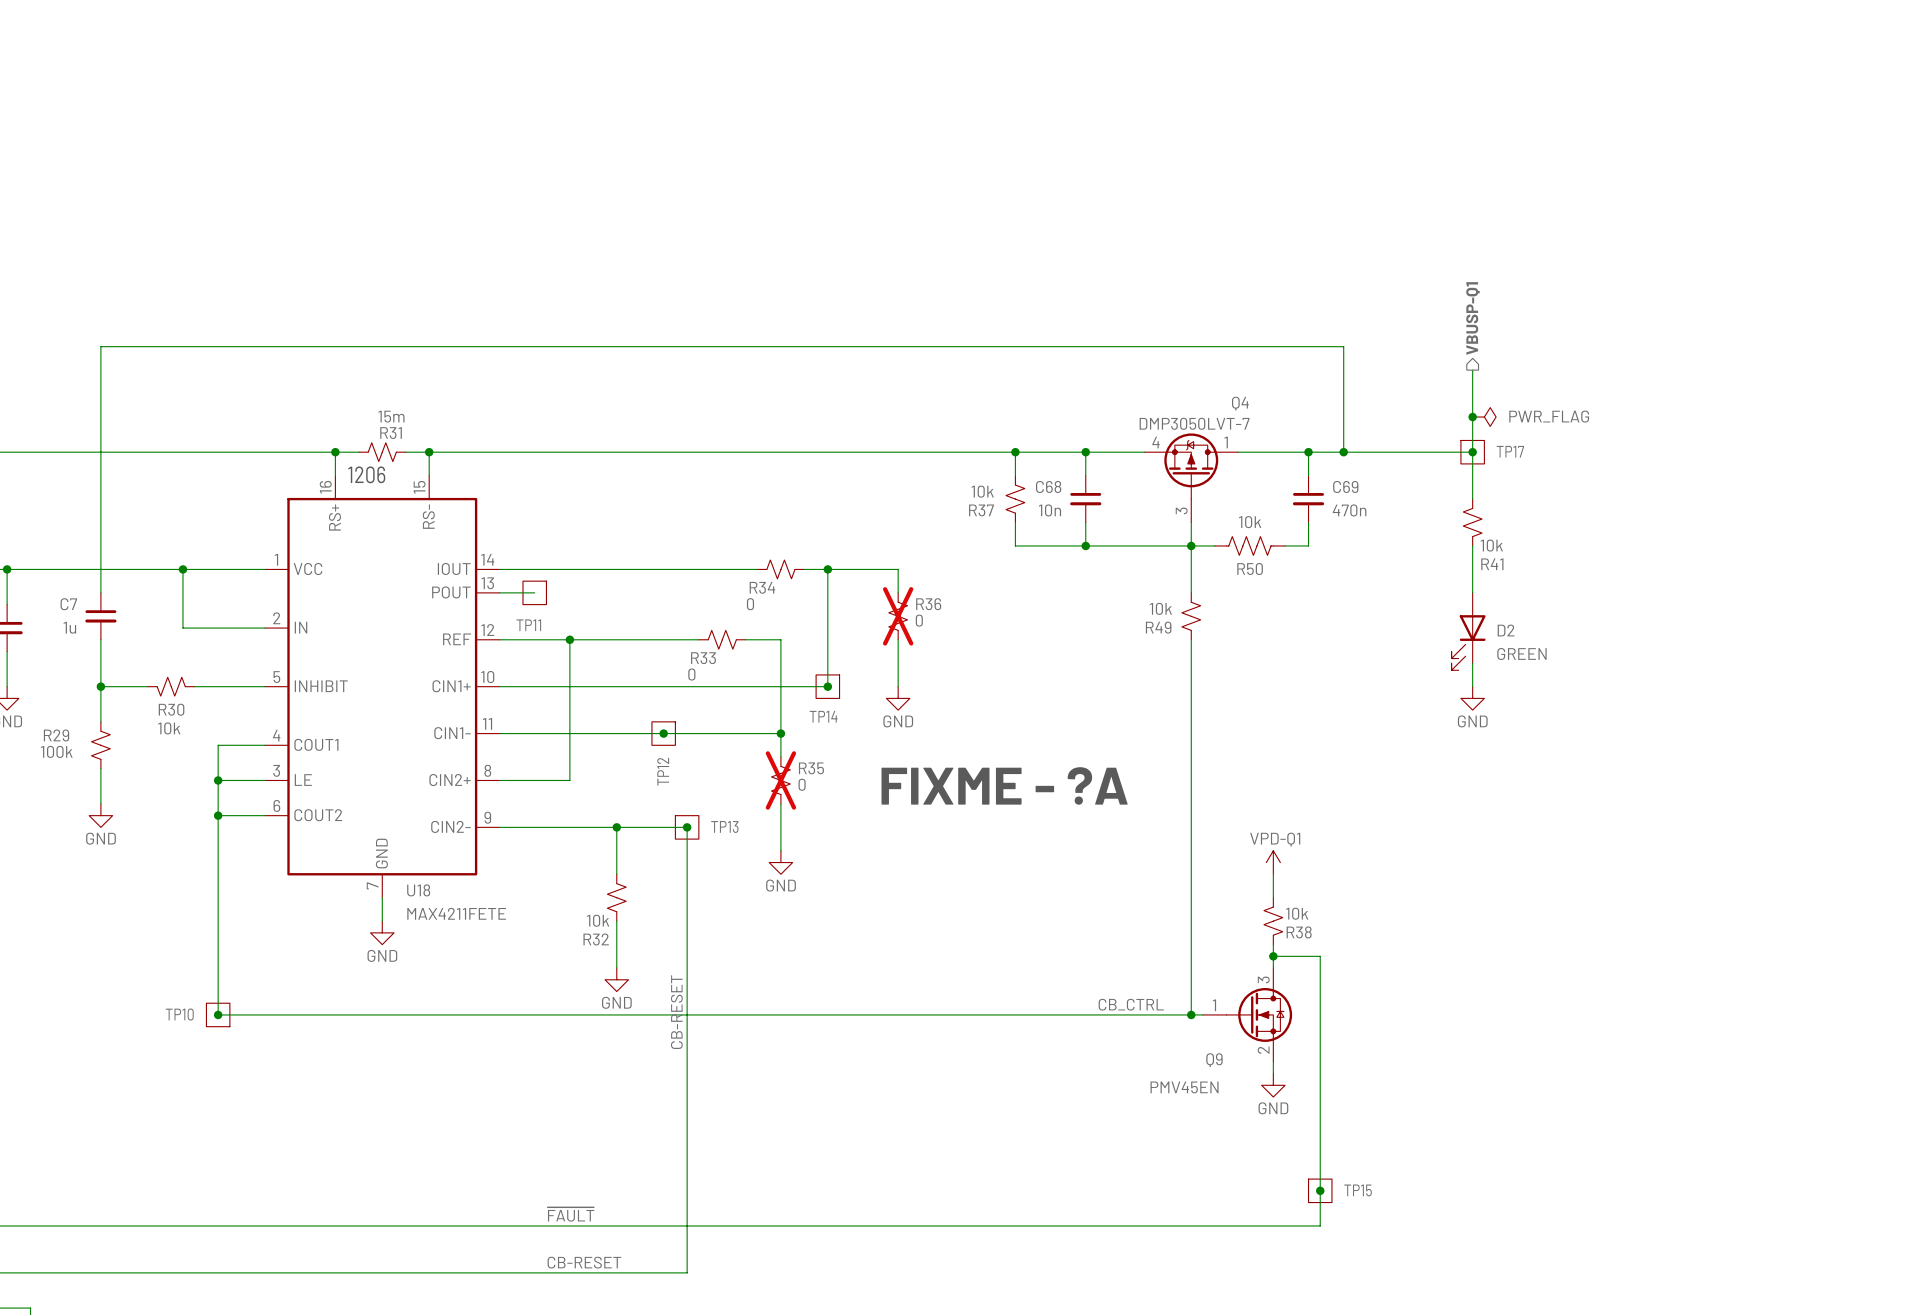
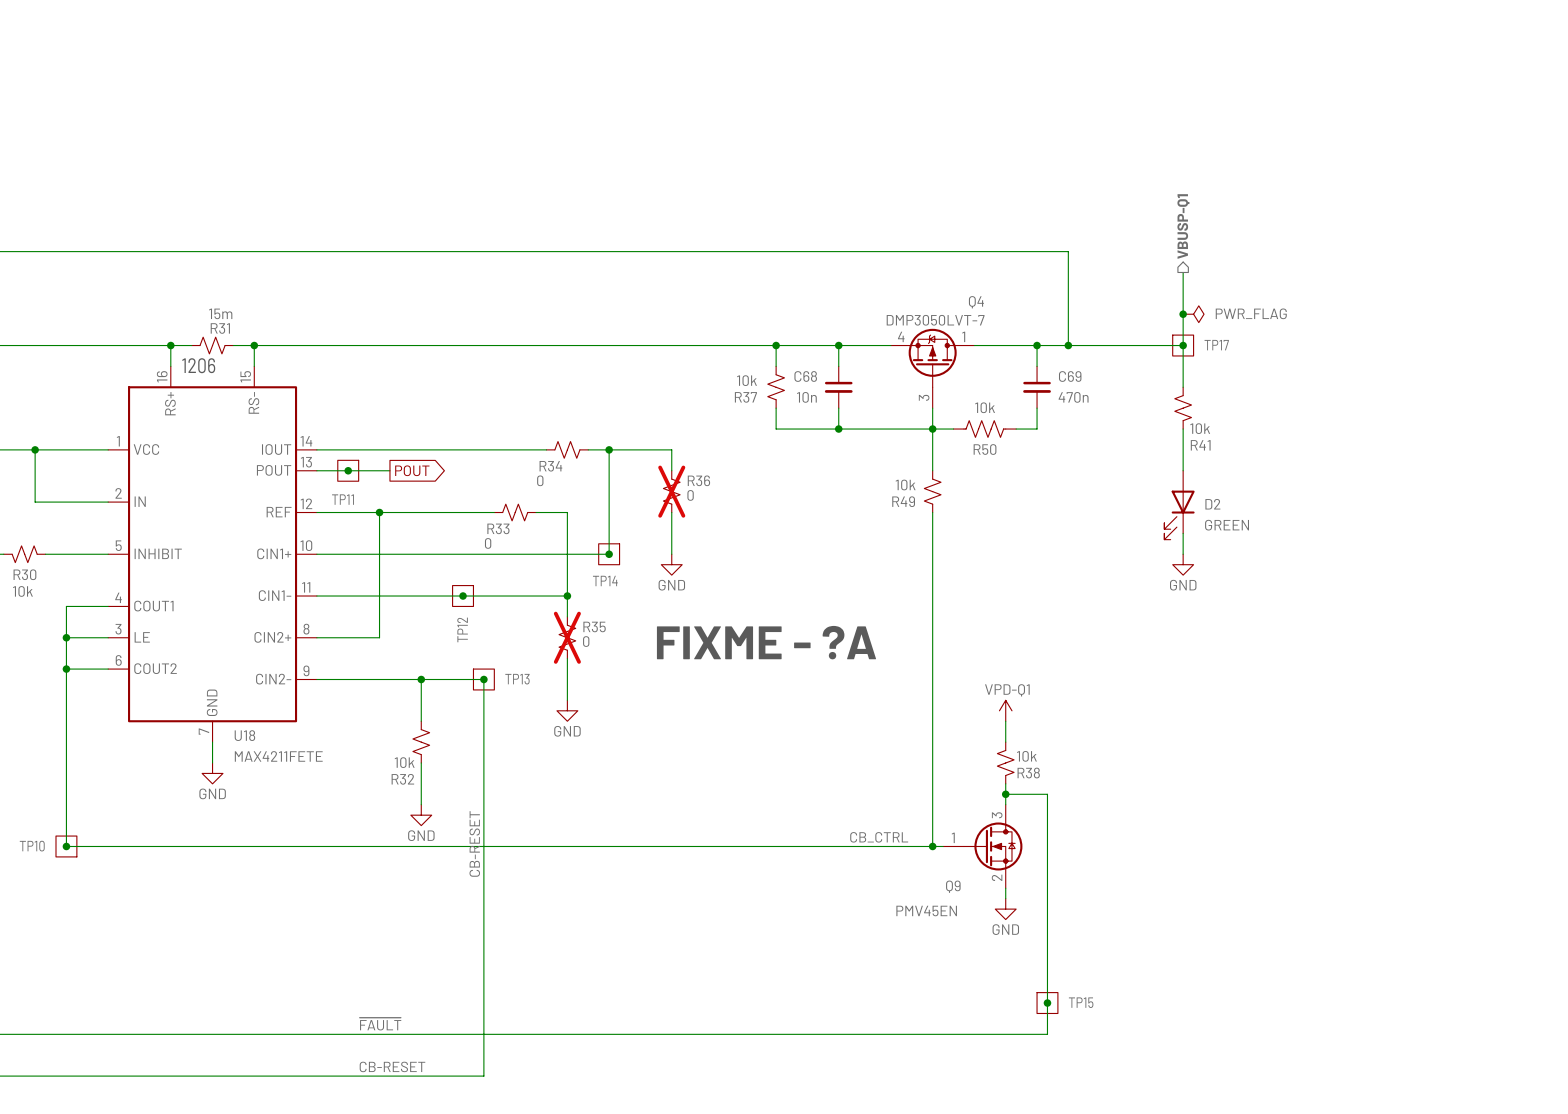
wire: none -> (348, 470) (389, 470)
junction: none -> (348, 470)
global label: none -> POUT (412, 470)

